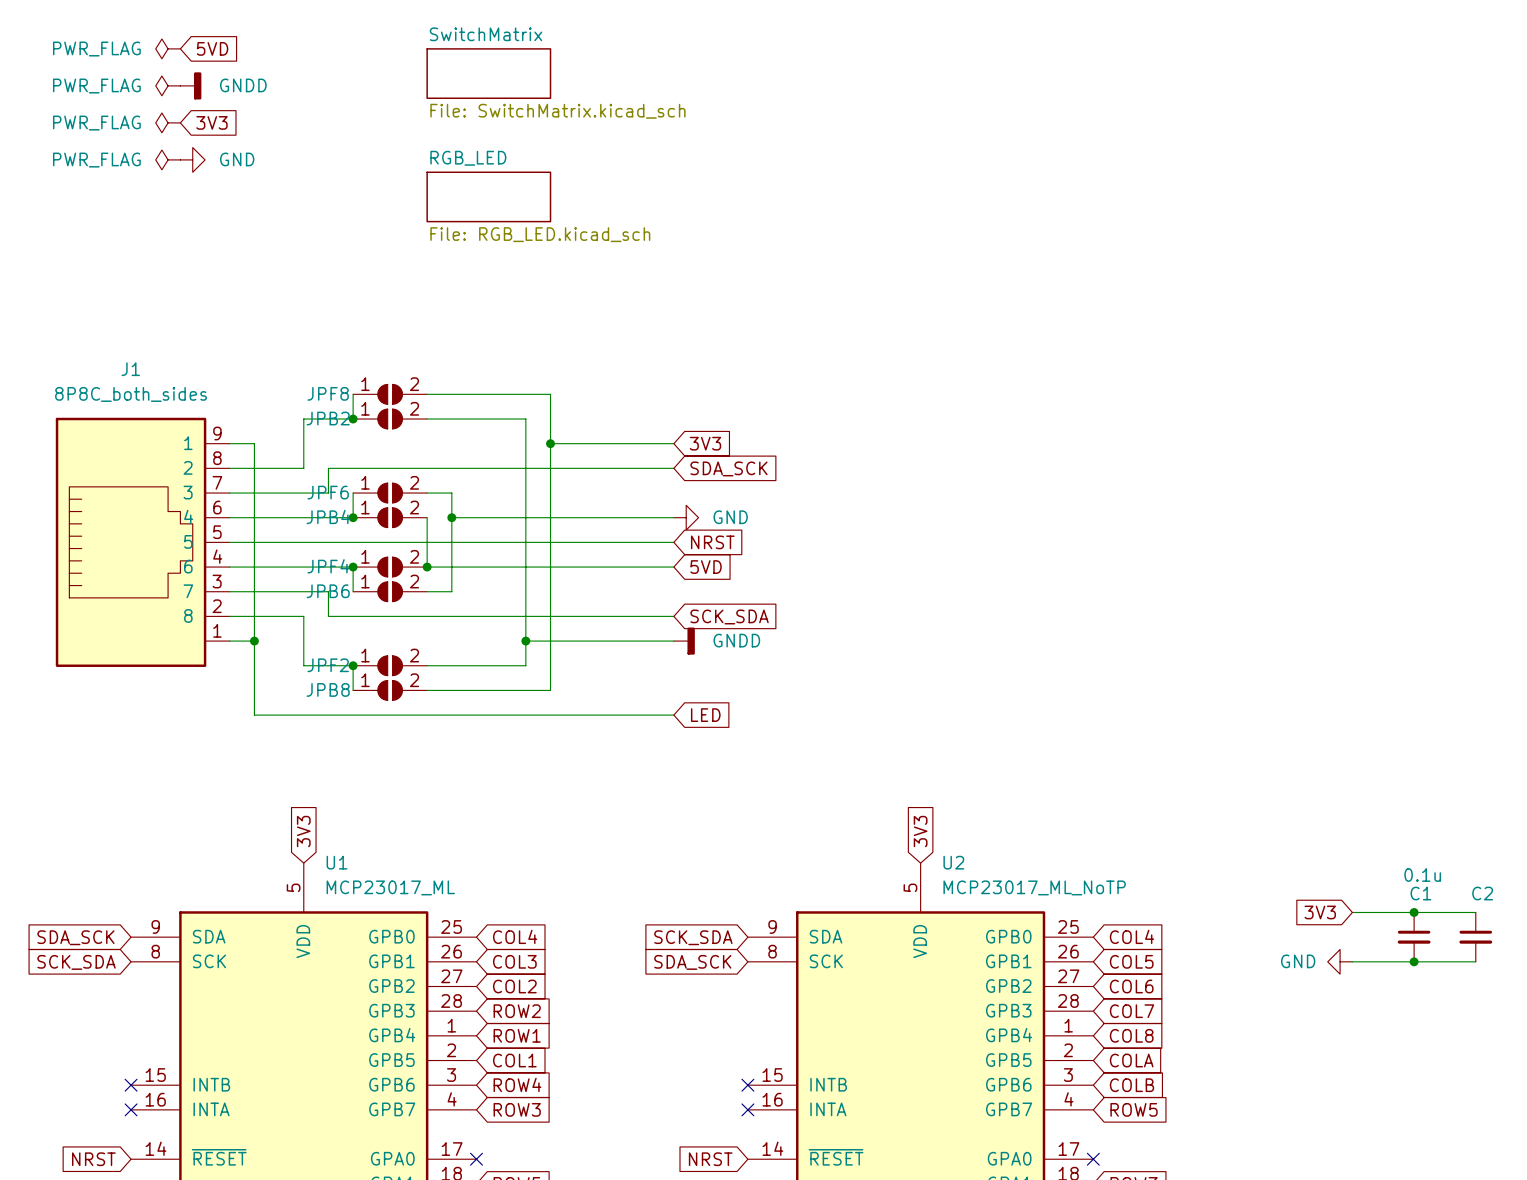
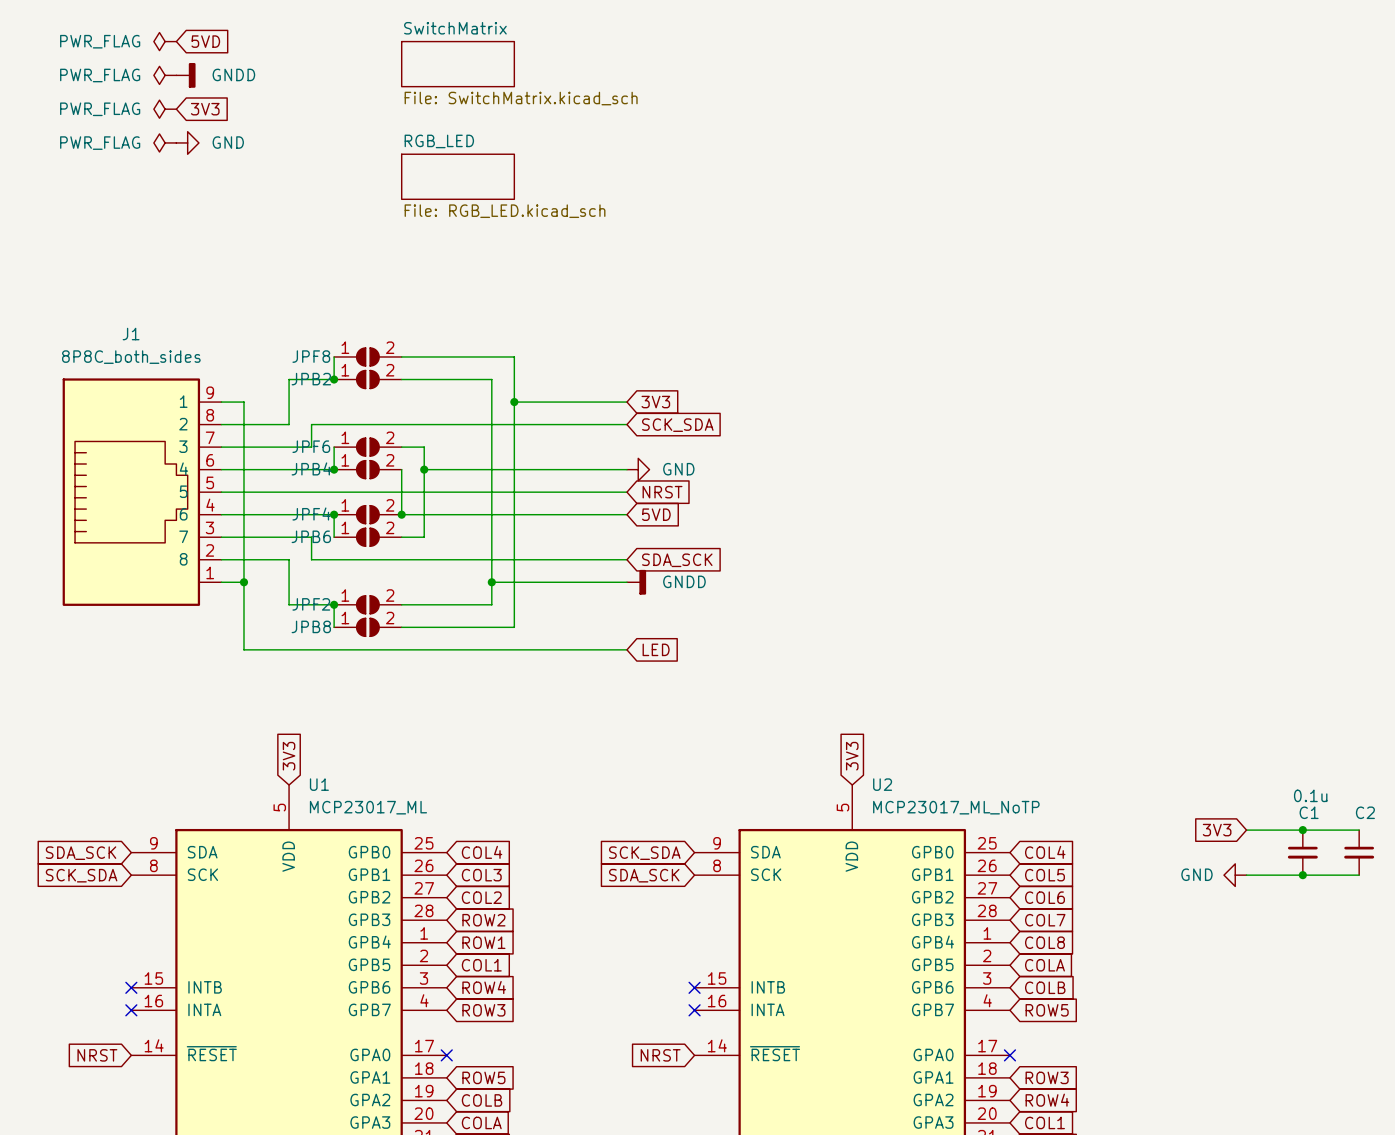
global label: SDA_SCK (728, 468) -> SCK_SDA (677, 425)
global label: SCK_SDA (729, 616) -> SDA_SCK (677, 560)

